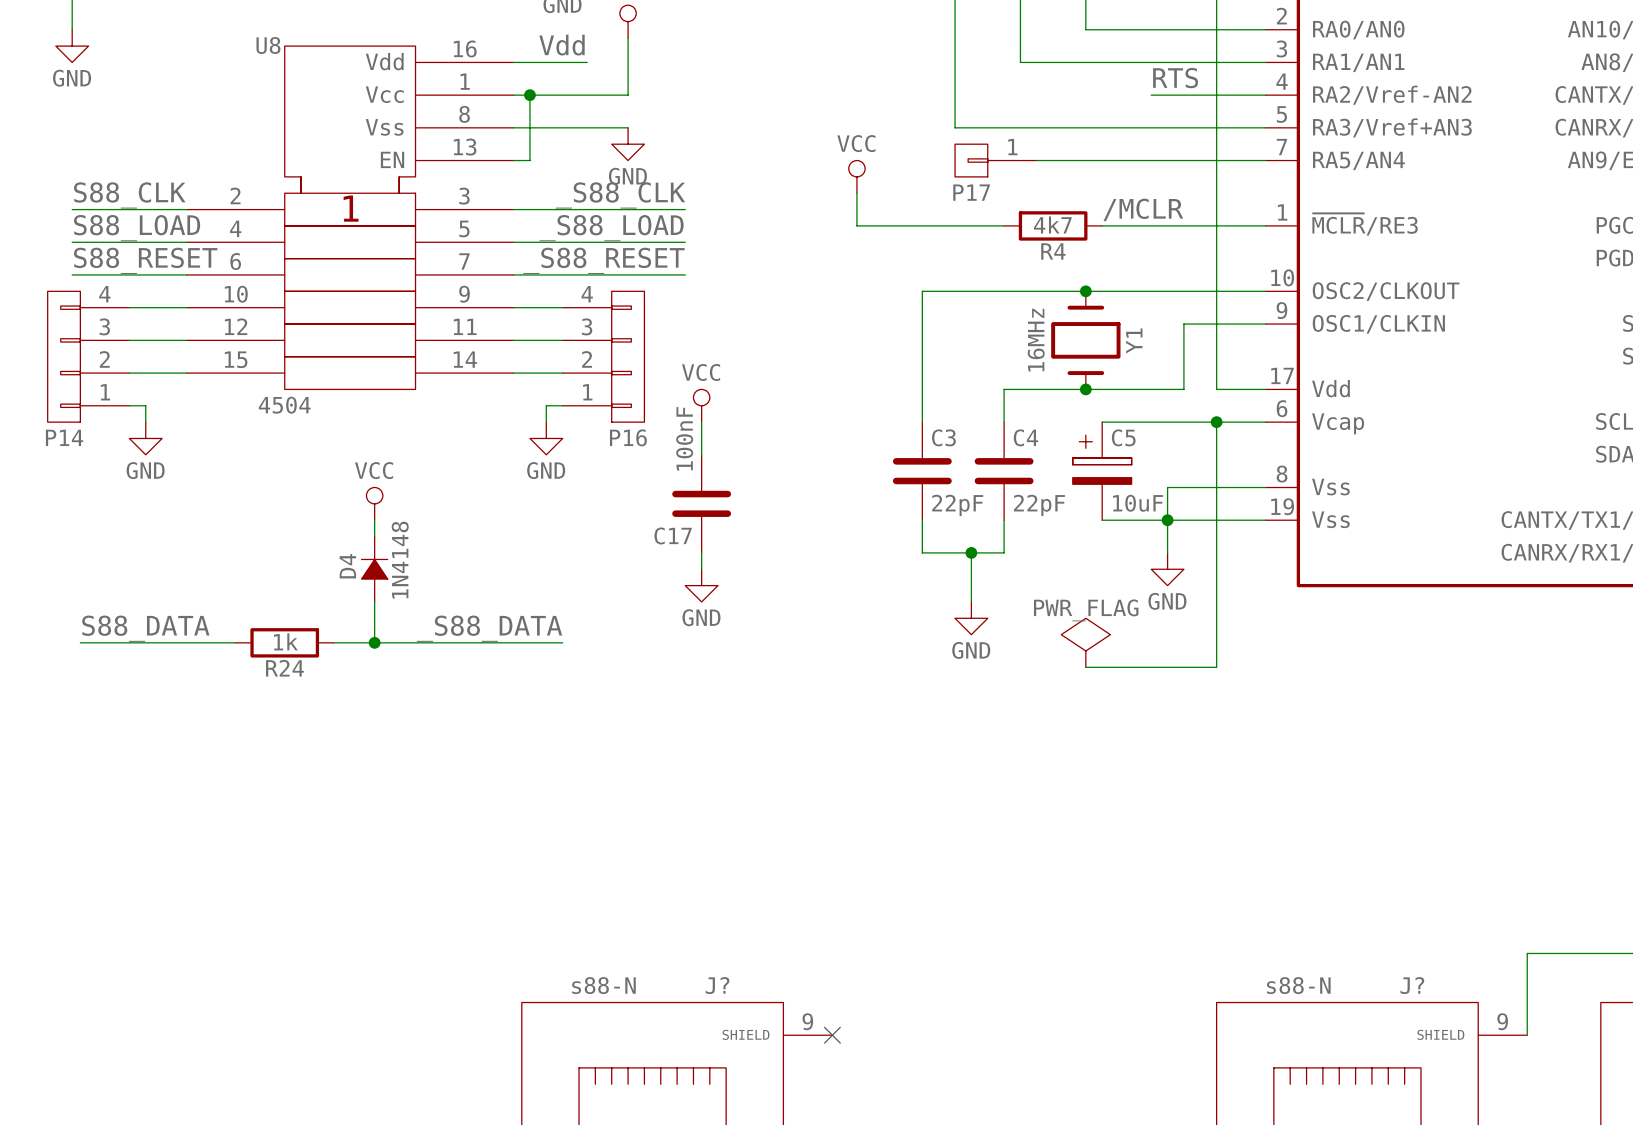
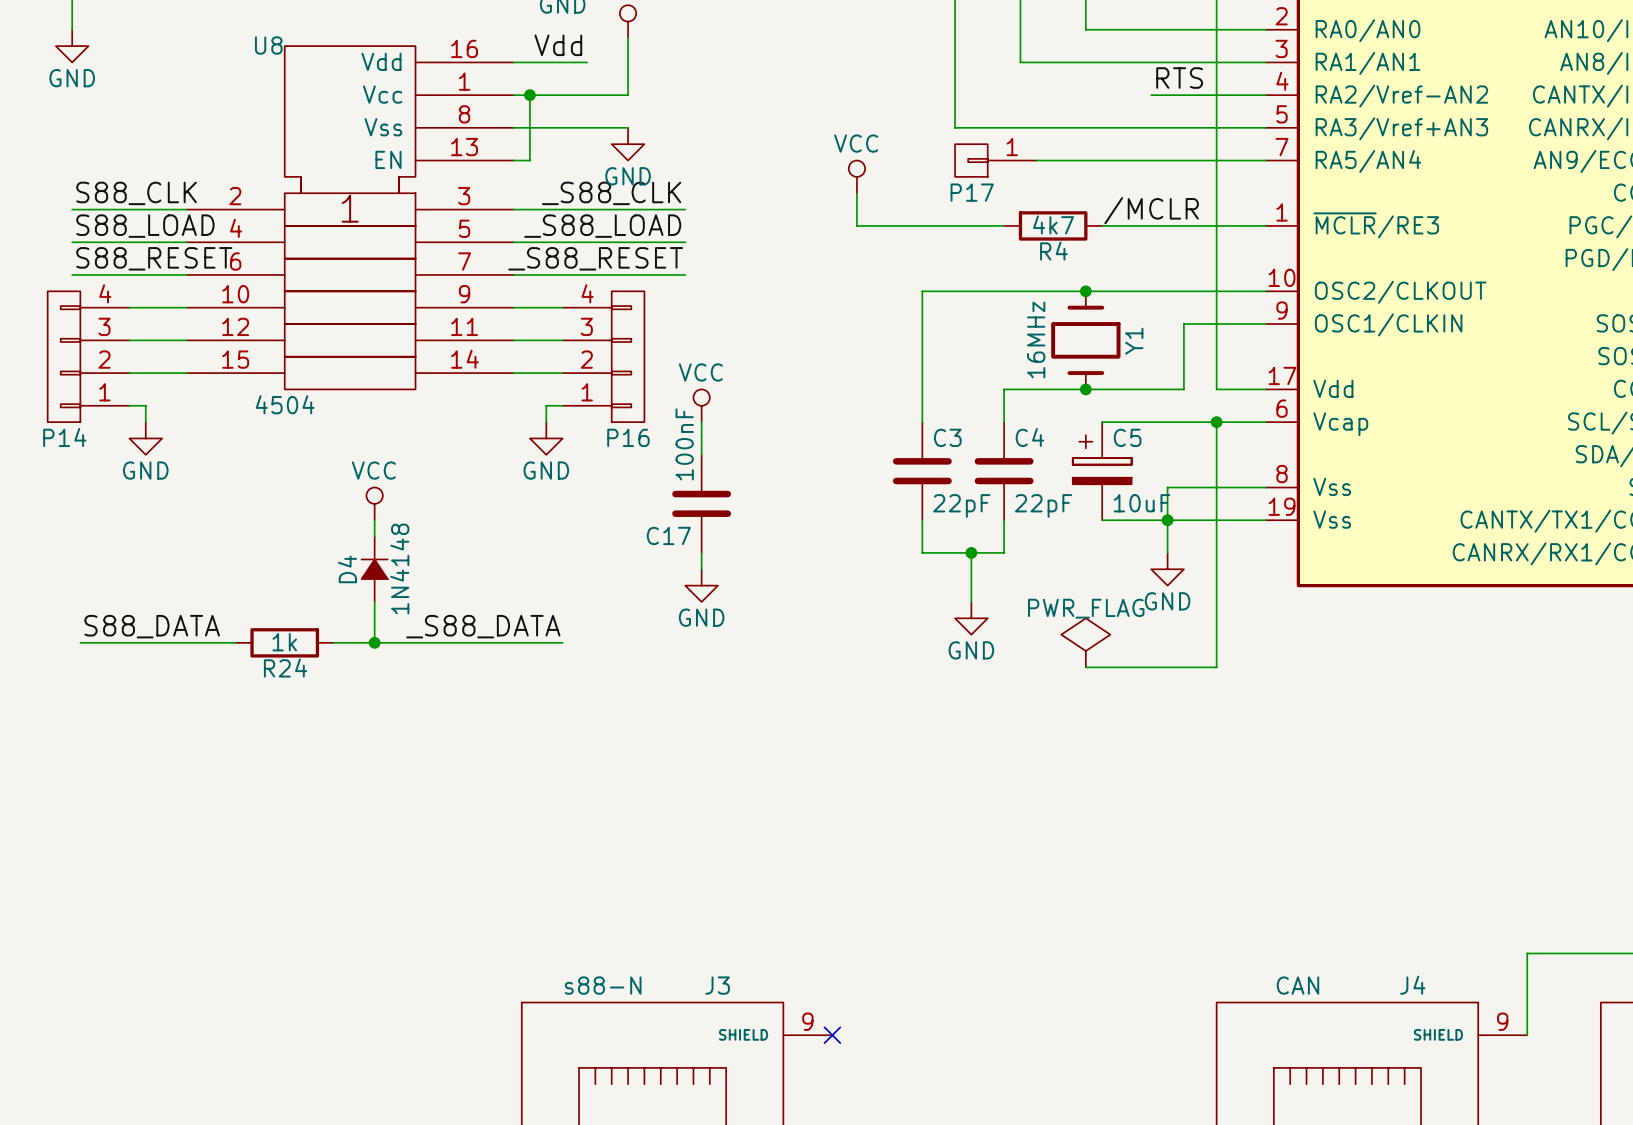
J? name: J? (717, 985) -> J3 (717, 985)
J? value: s88-N (1298, 985) -> CAN (1297, 985)
J? name: J? (1412, 985) -> J4 (1412, 985)

